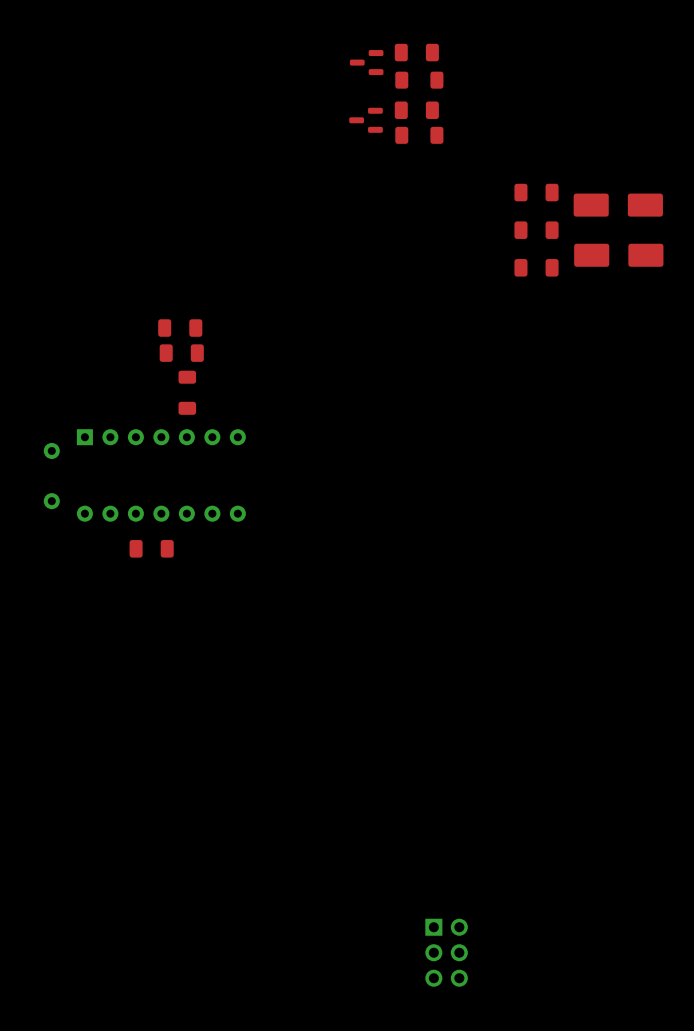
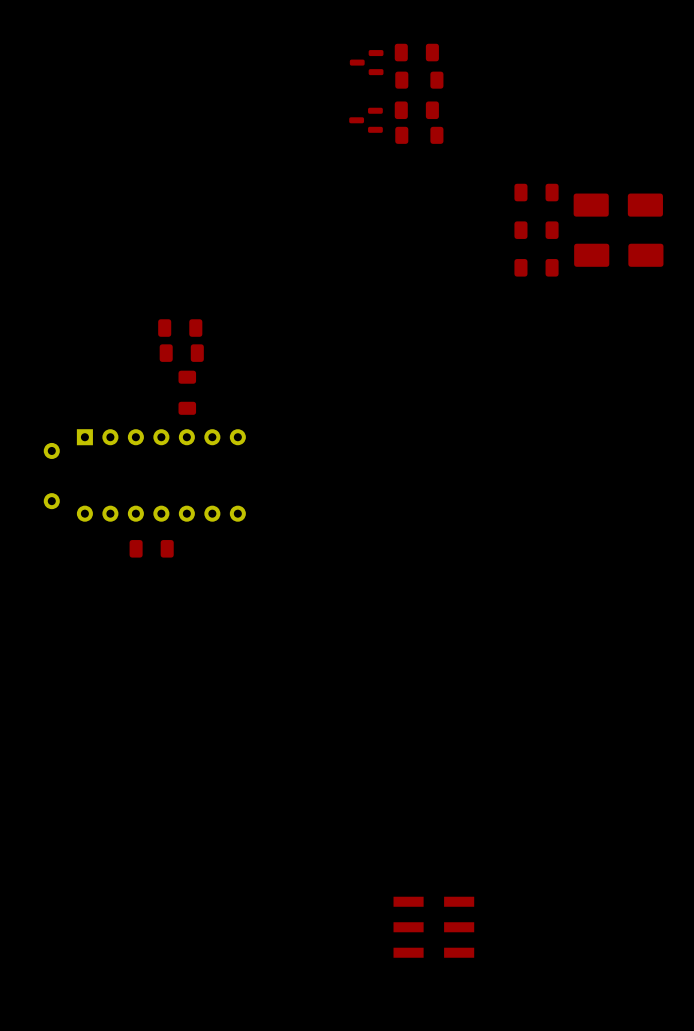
part: none -> (433, 927)
part: (446, 952) -> none

